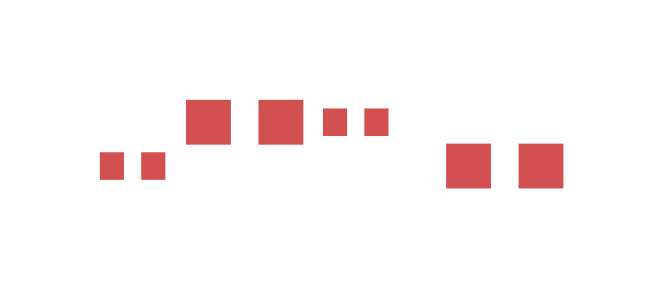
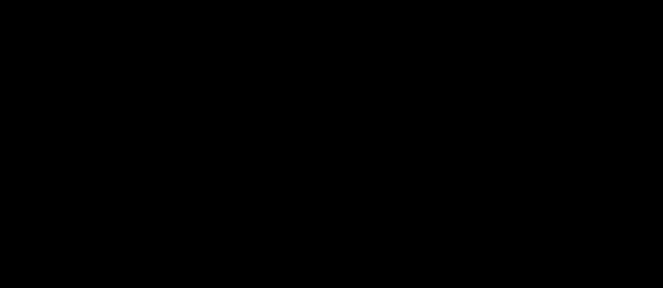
part: (244, 122) -> none
part: (355, 122) -> none
part: (132, 166) -> none
part: (504, 166) -> none

